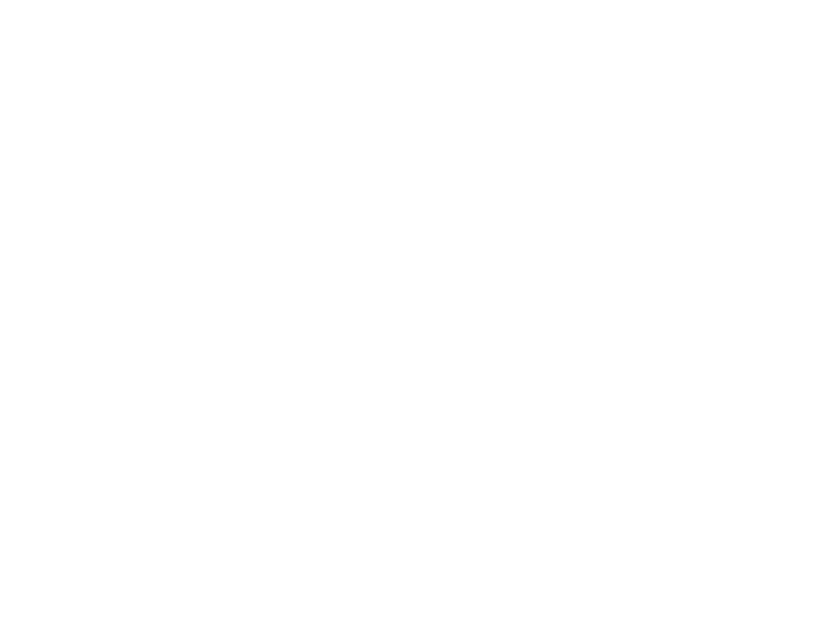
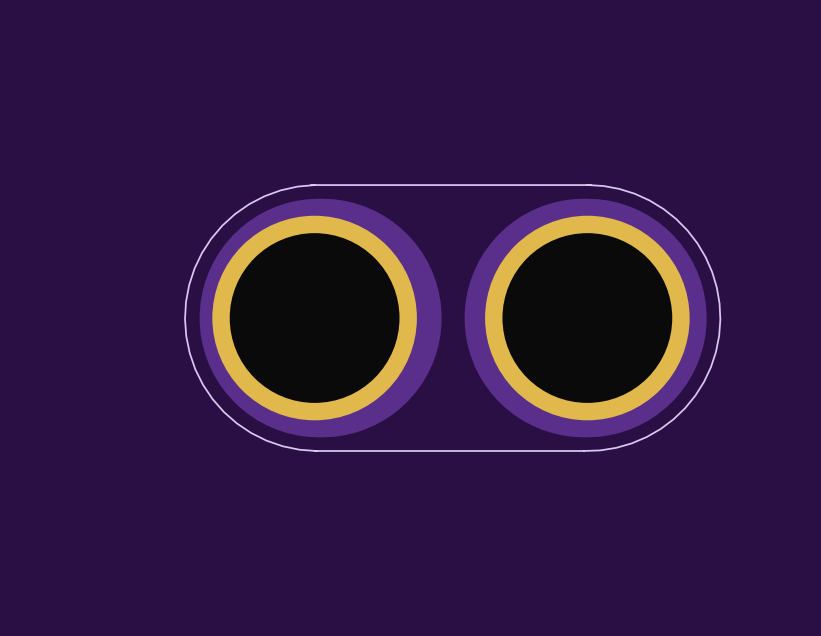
part: none -> (452, 318)

